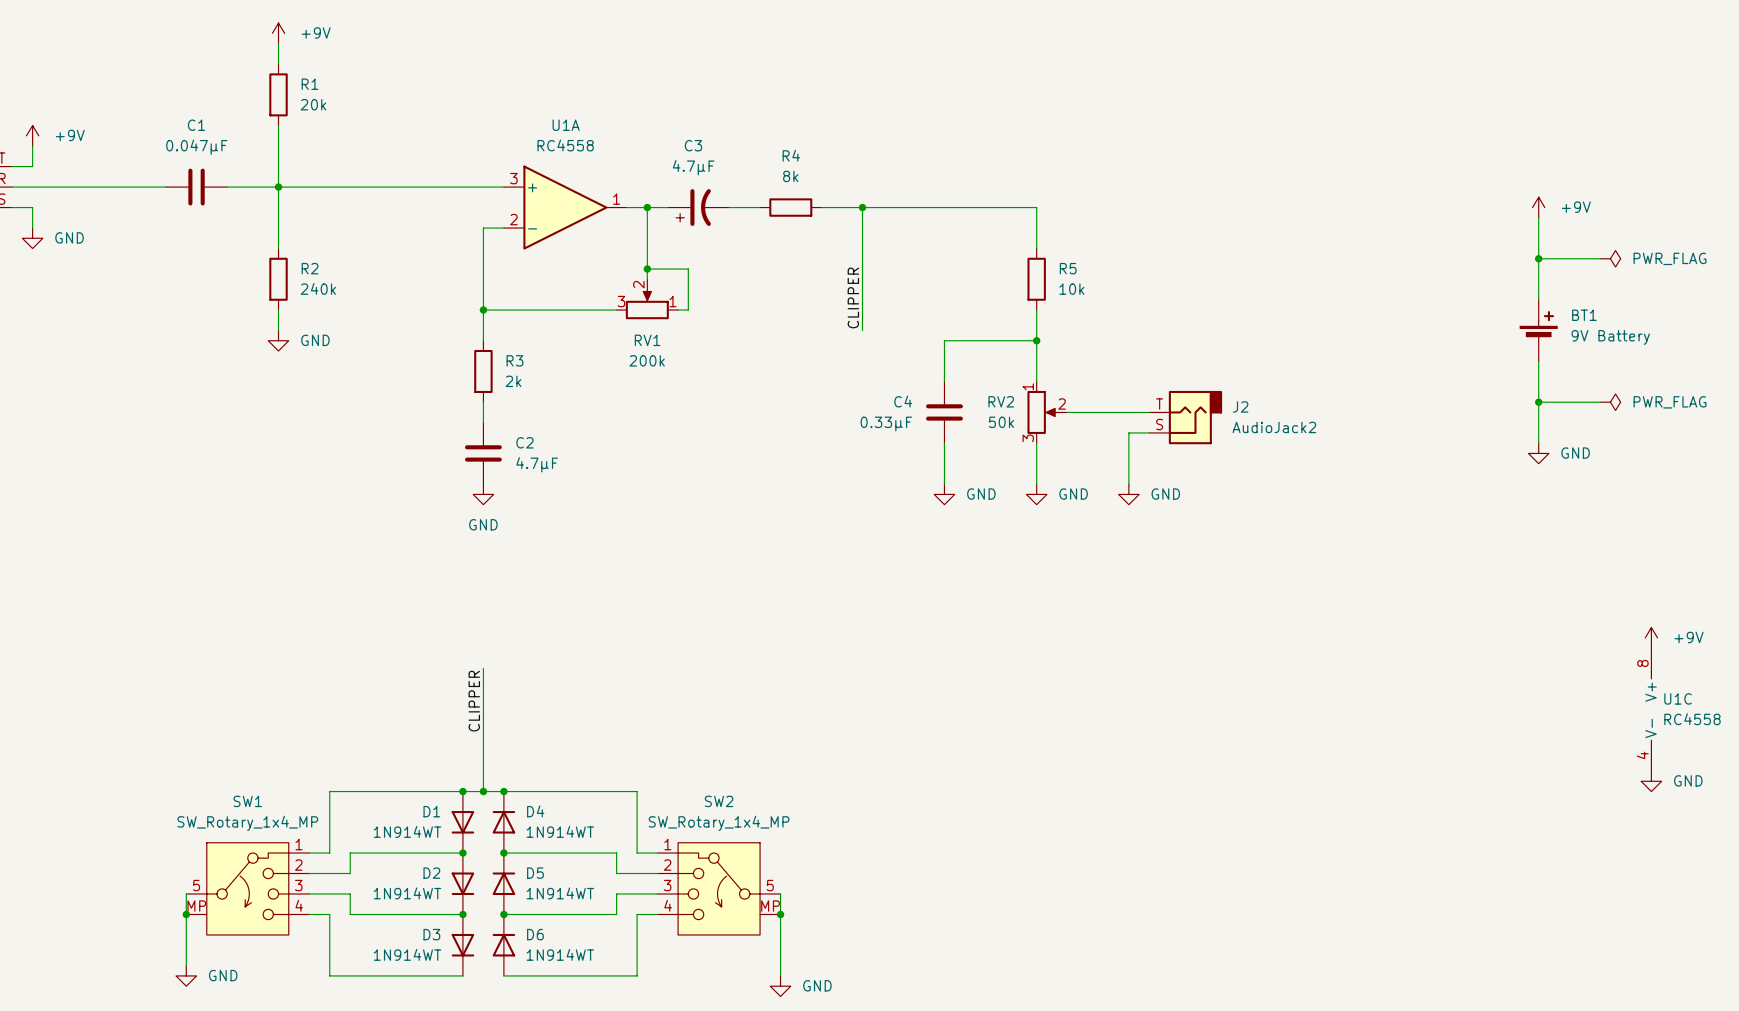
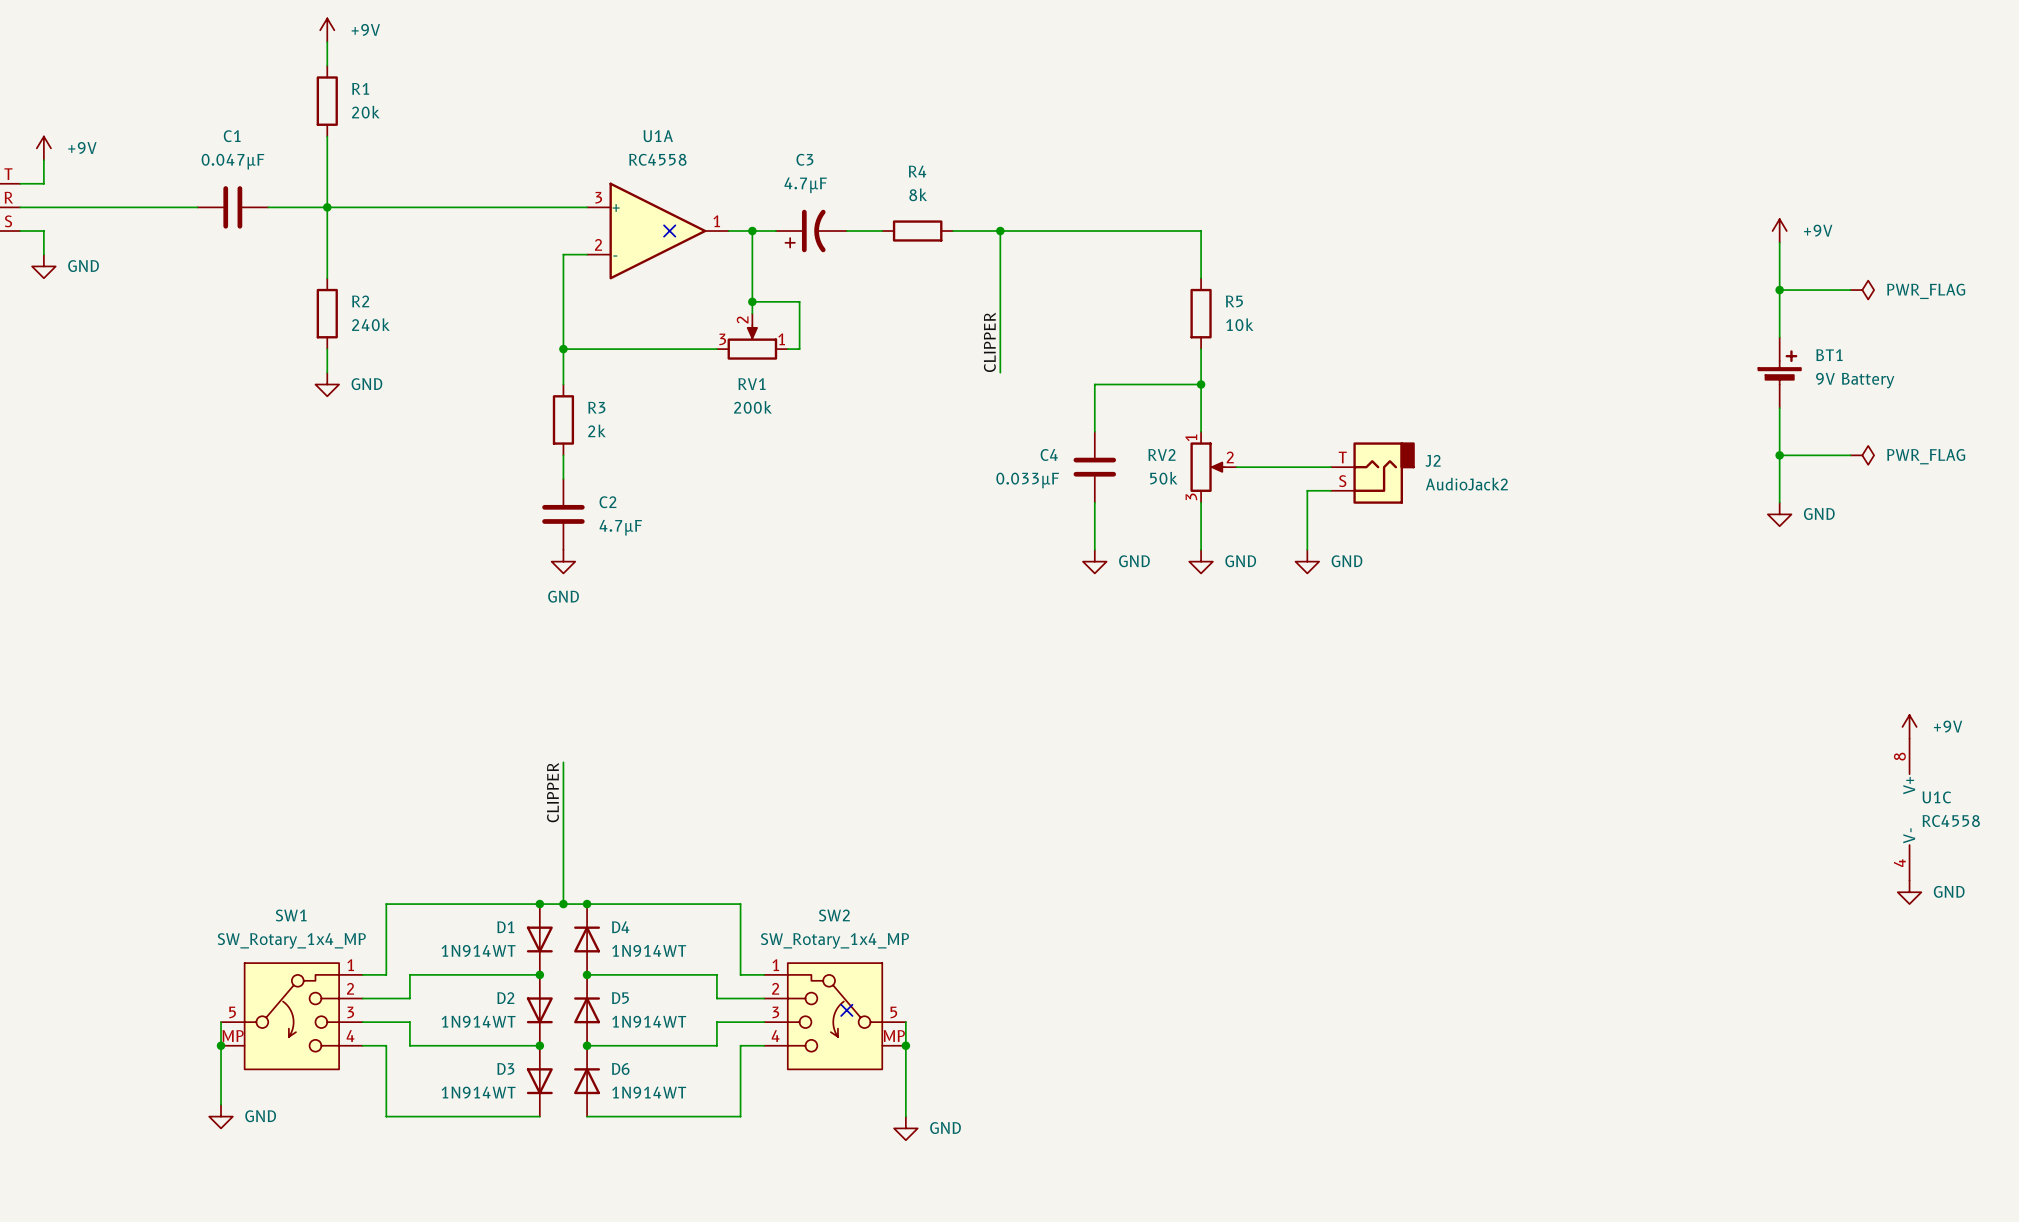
no-connect mark: none -> (669, 231)
C4 value: 0.33µF (886, 424) -> 0.033µF (1027, 480)
no-connect mark: none -> (846, 1010)

